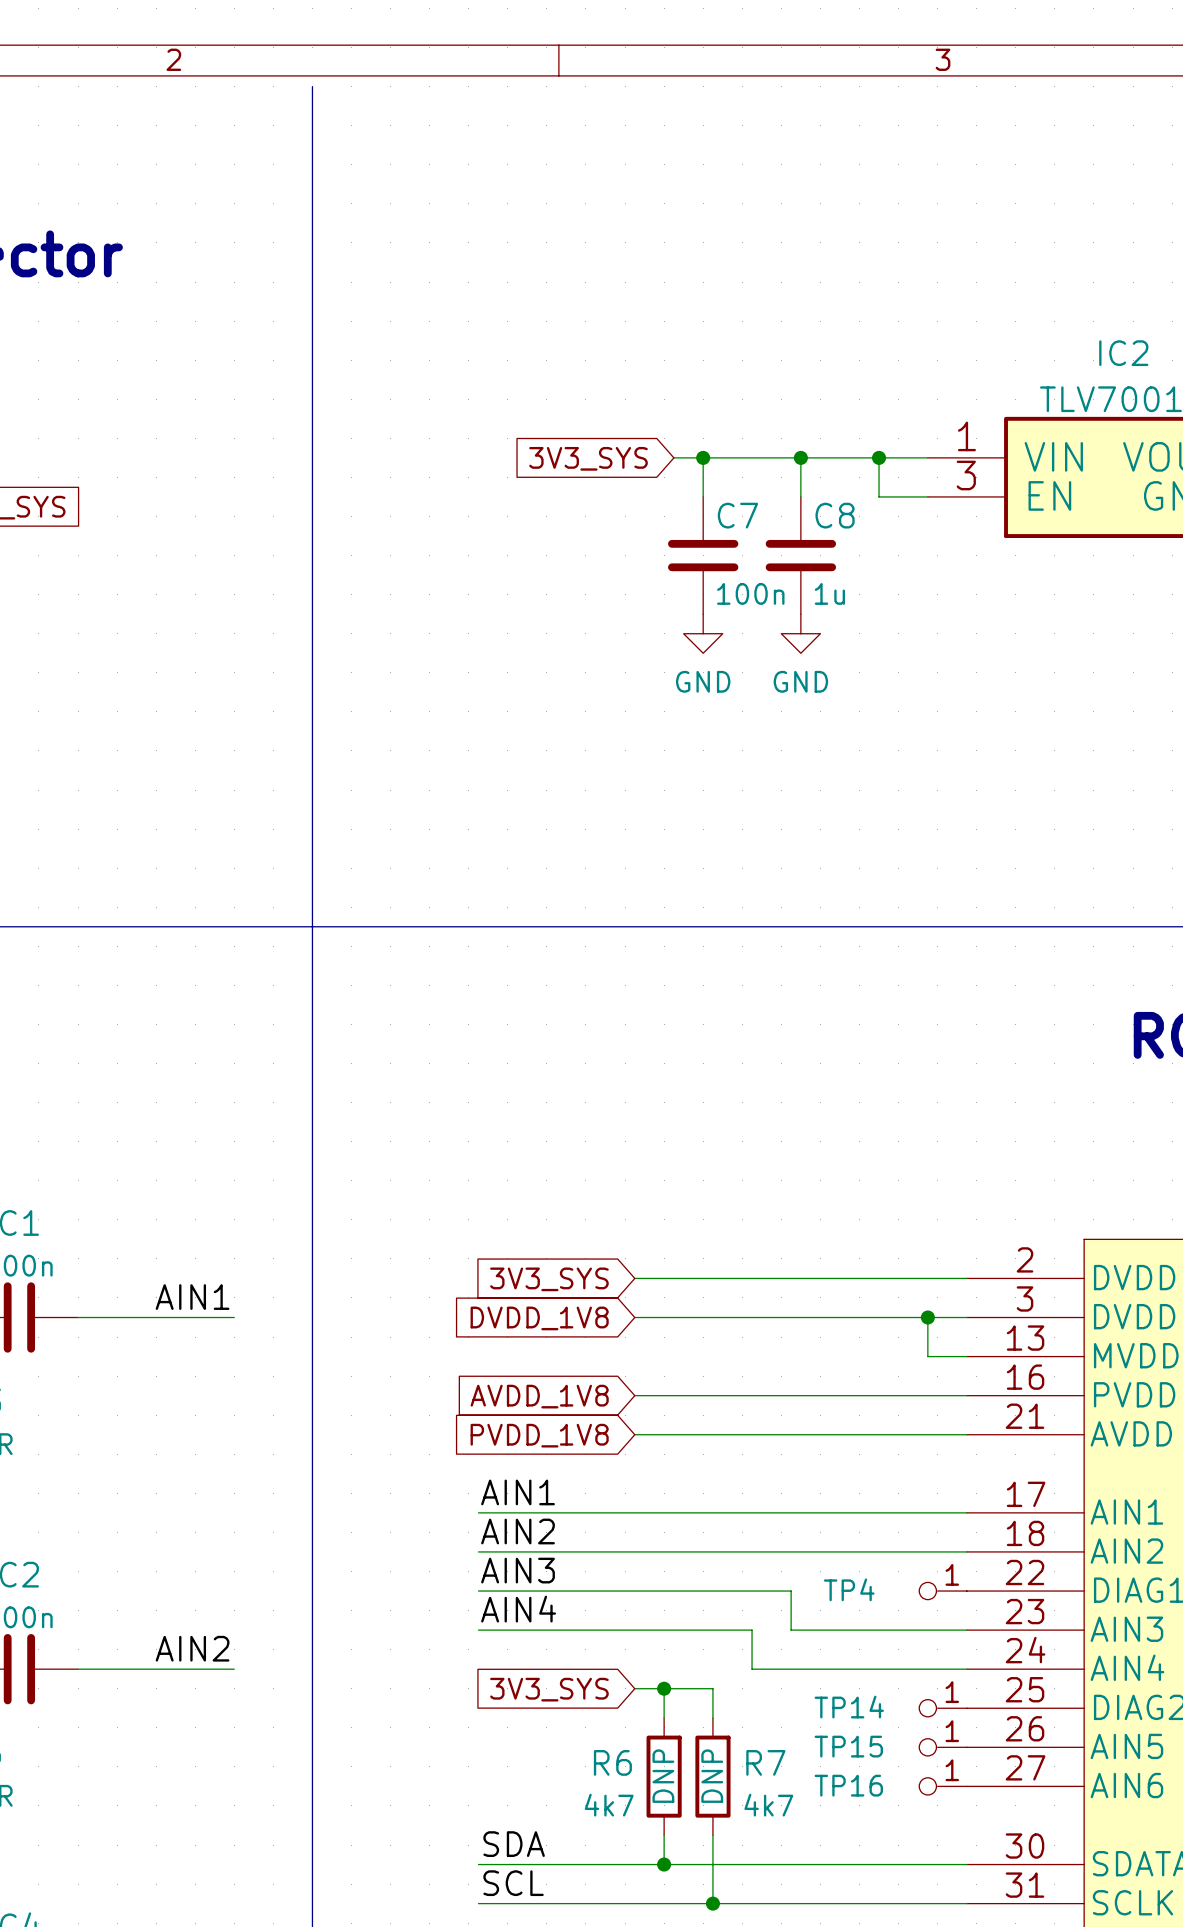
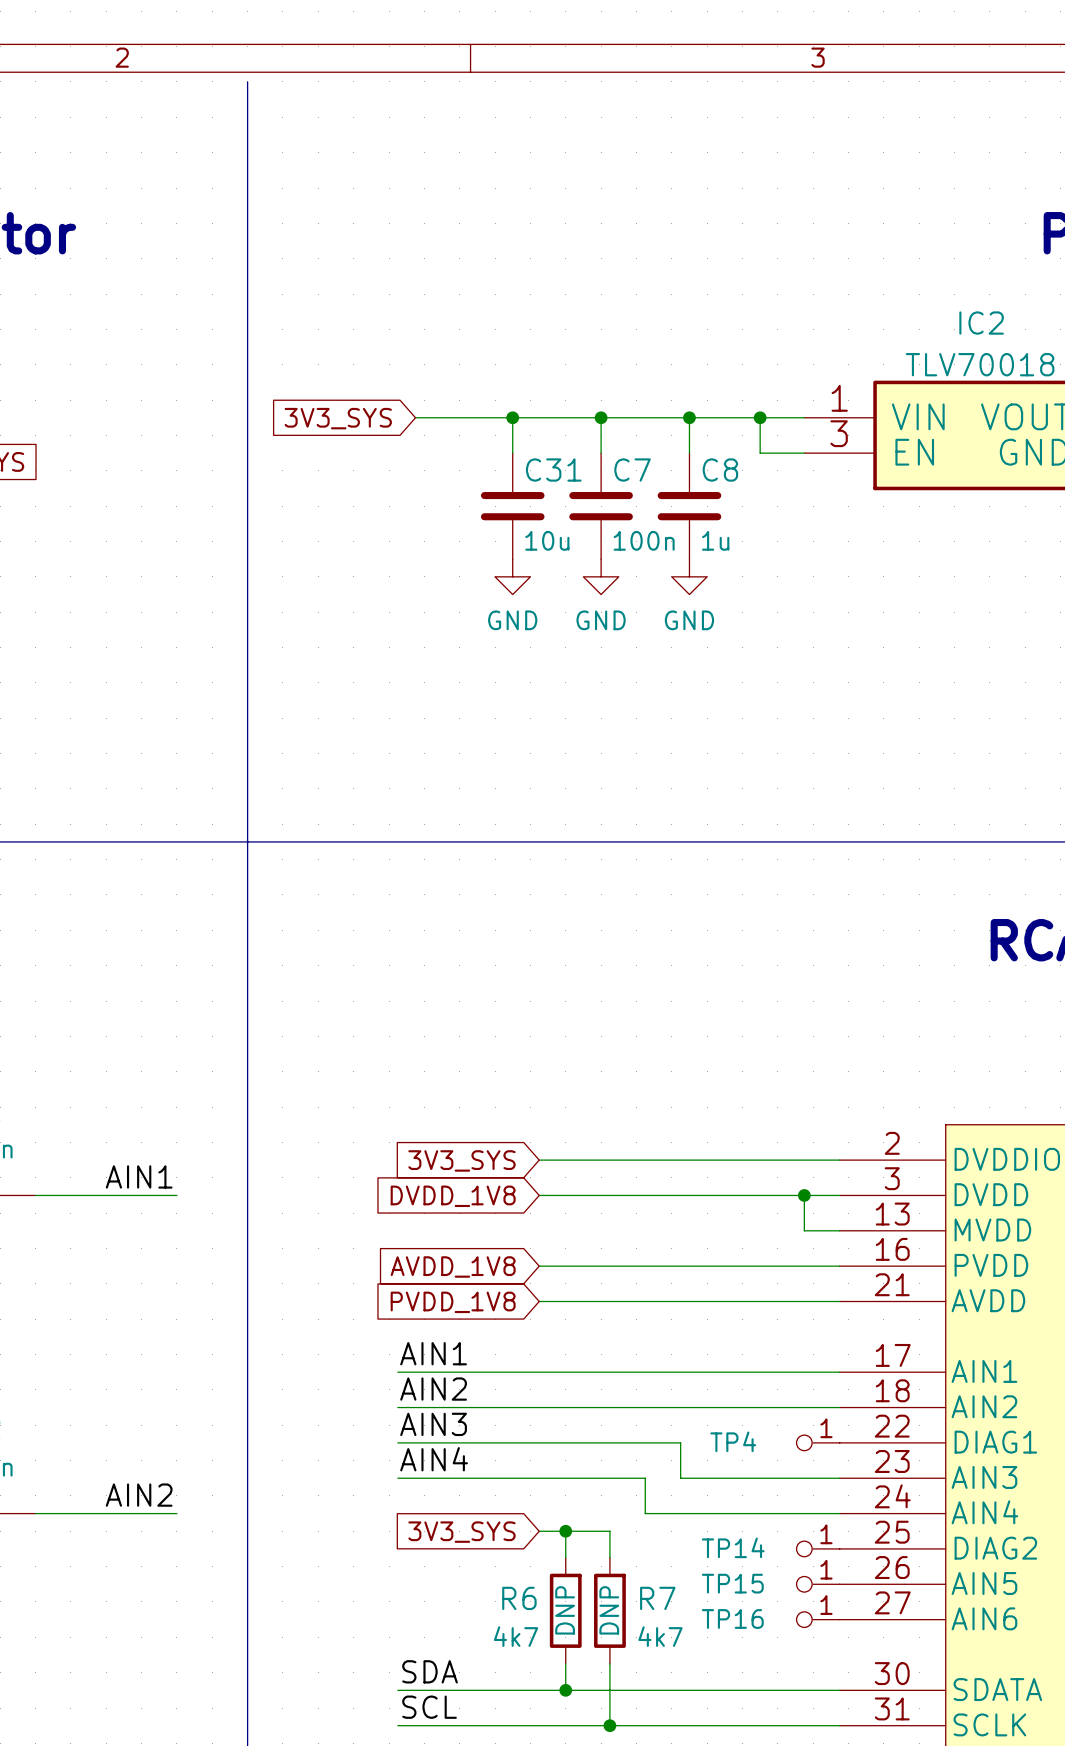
wire: none -> (415, 417) (574, 417)
wire: none -> (512, 417) (512, 453)
junction: none -> (512, 417)
global label position: 3V3_SYS (588, 458) -> 3V3_SYS (338, 418)
C31: none -> (512, 506)
power symbol: none -> GND (512, 576)

